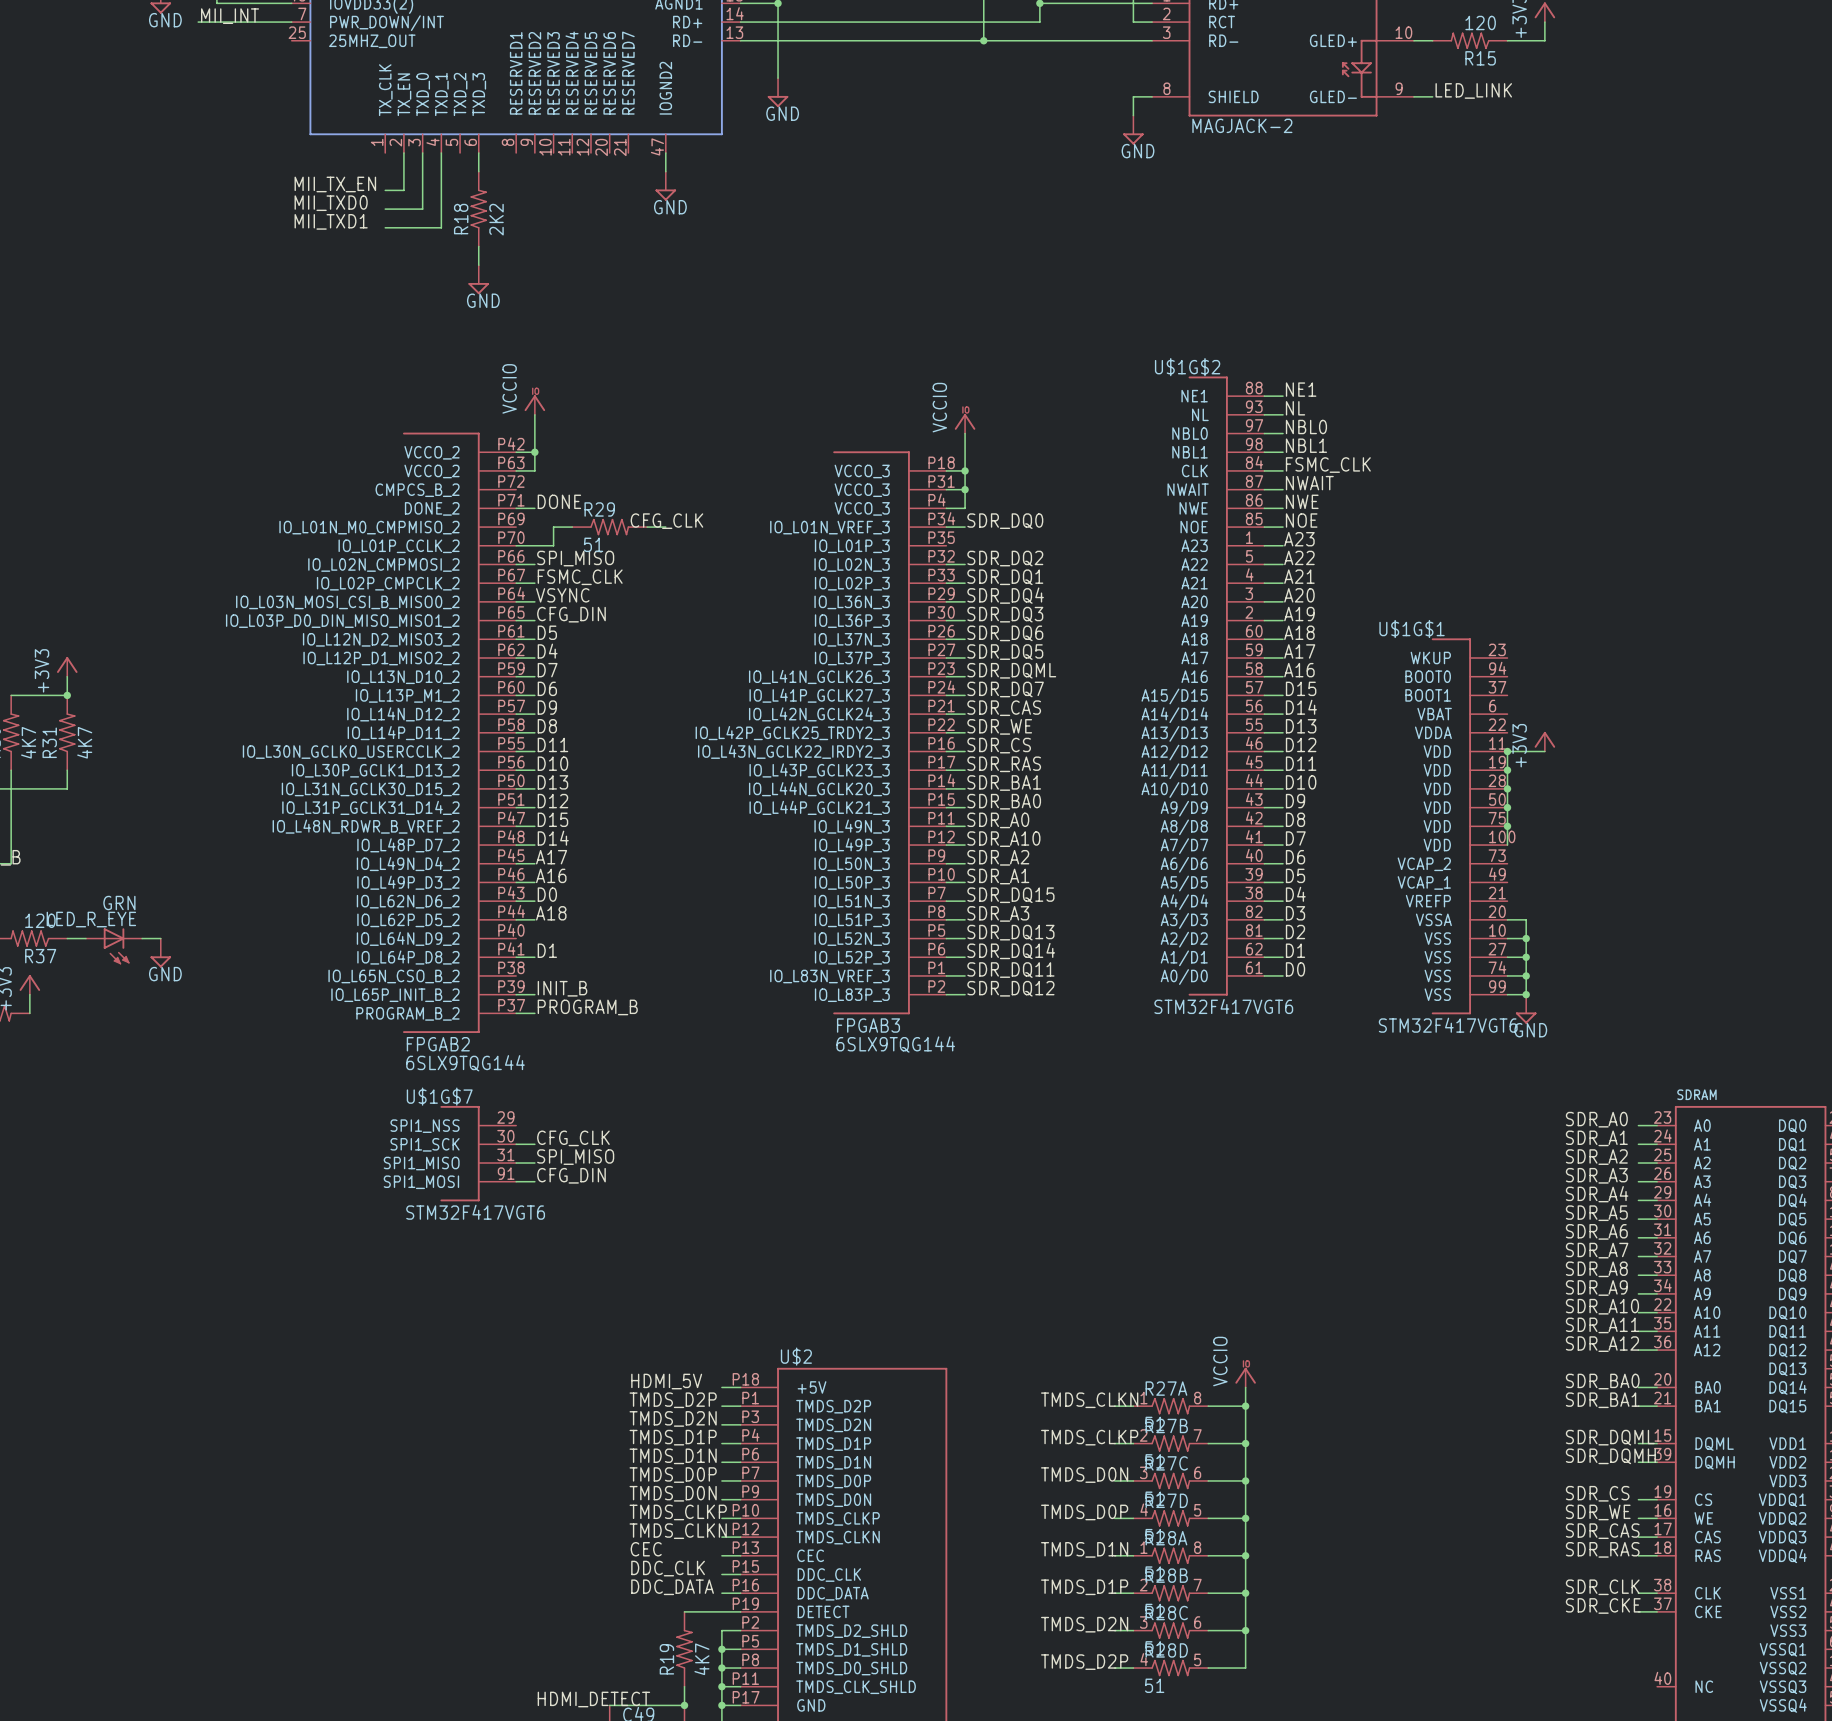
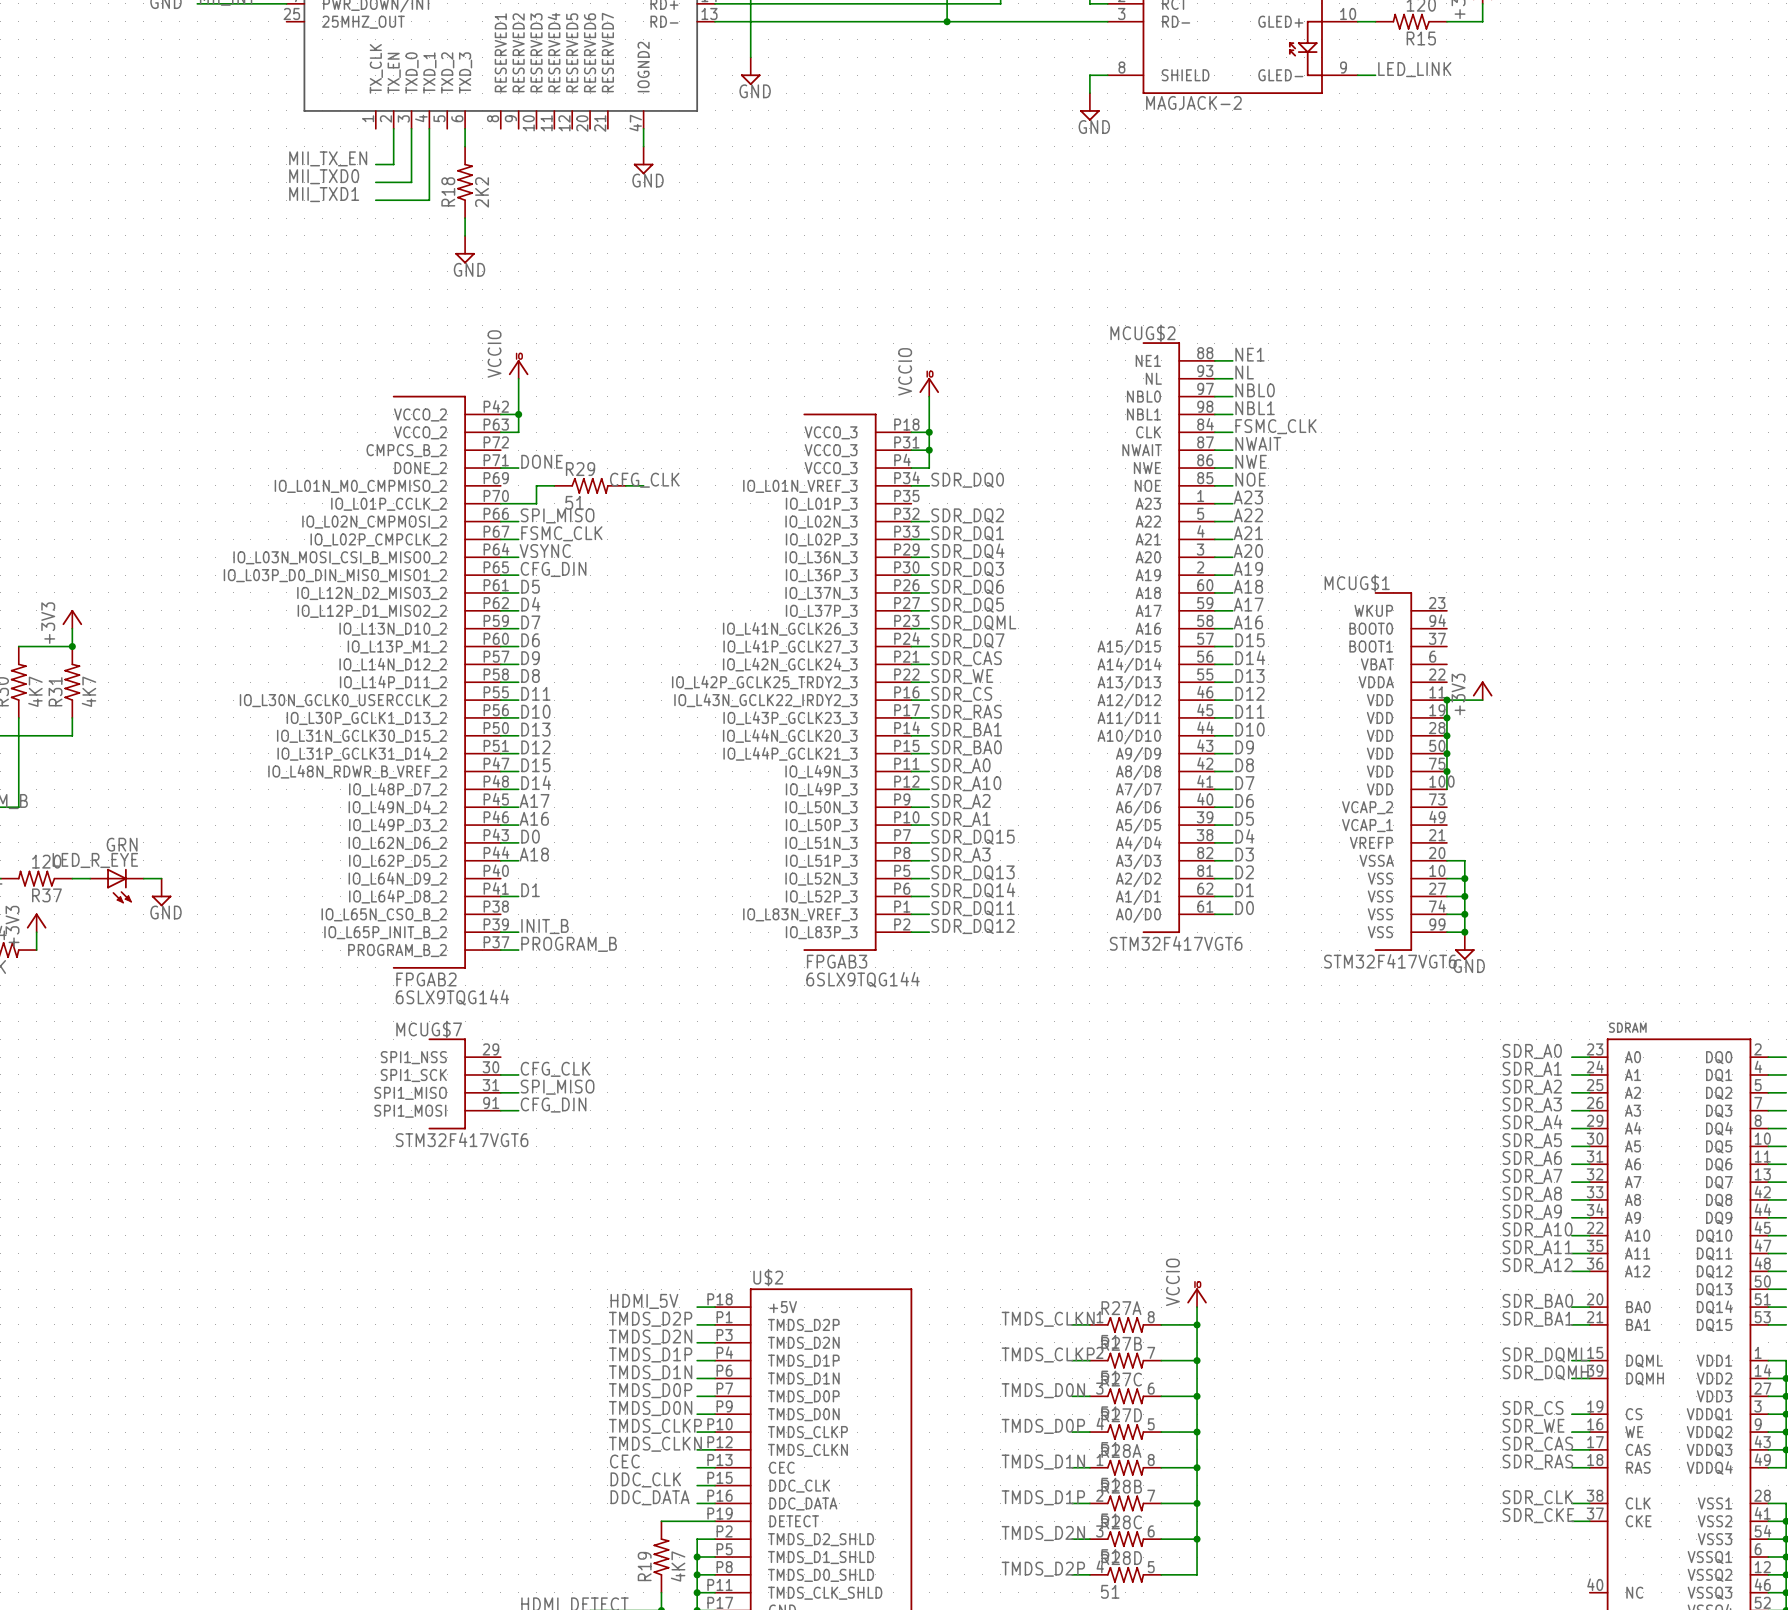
U$1G$2 name: U$1G$2 (1187, 367) -> MCUG$2 (1142, 333)
U$1G$1 name: U$1G$1 (1412, 629) -> MCUG$1 (1357, 583)
U$1G$7 name: U$1G$7 (439, 1096) -> MCUG$7 (429, 1029)

